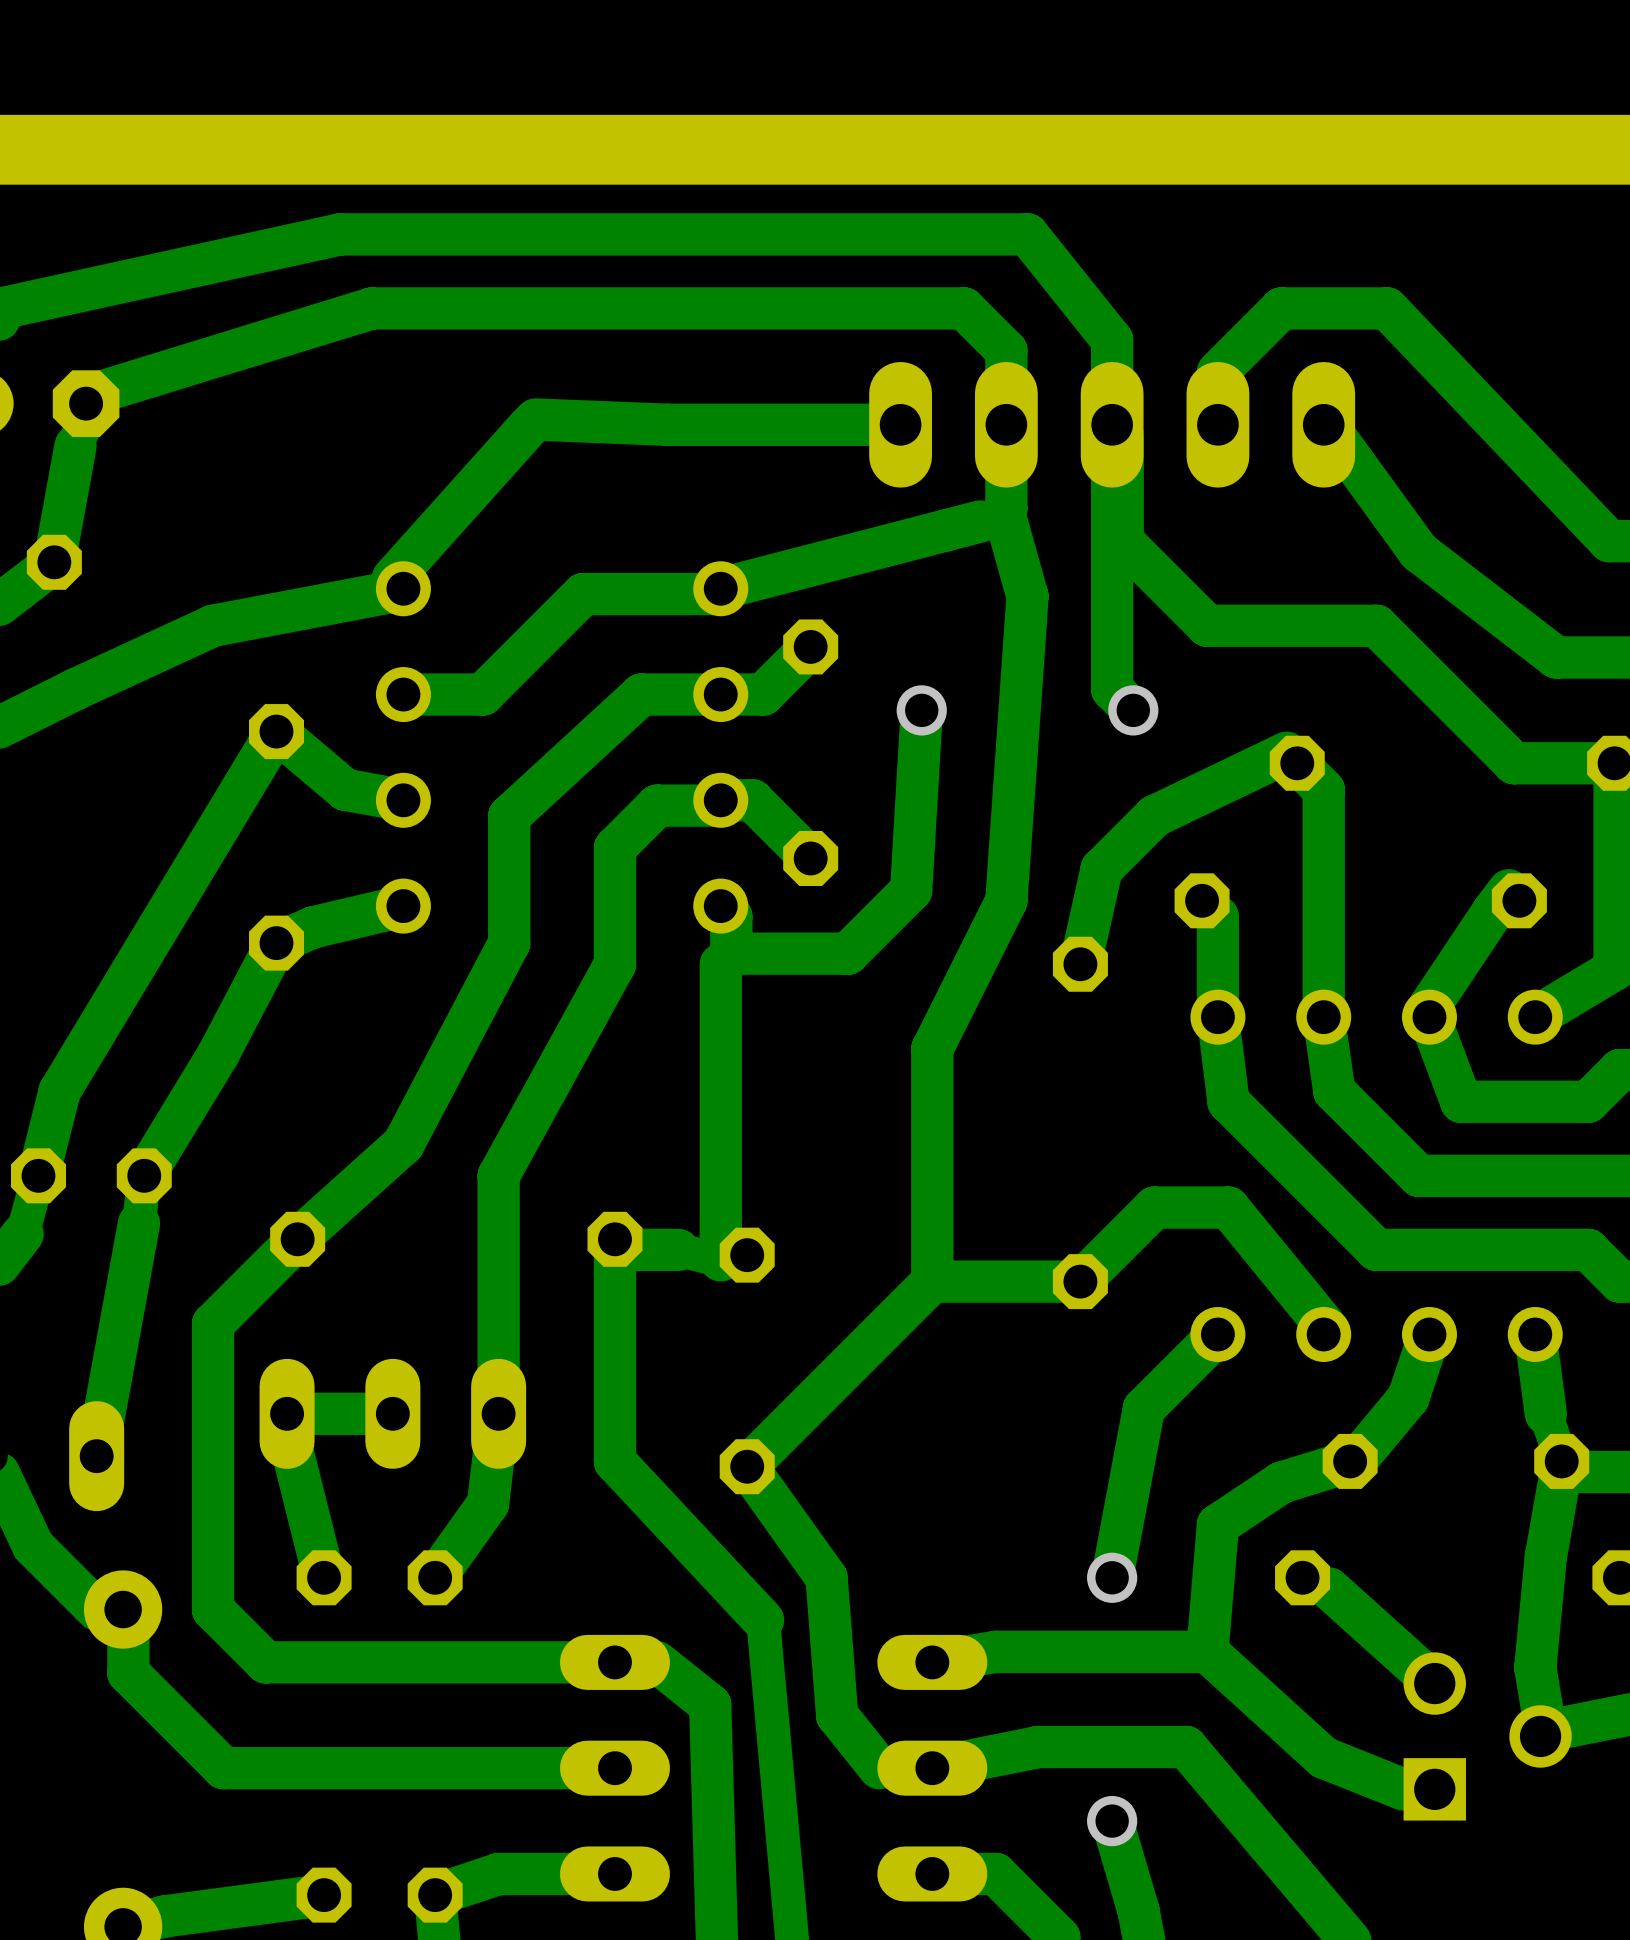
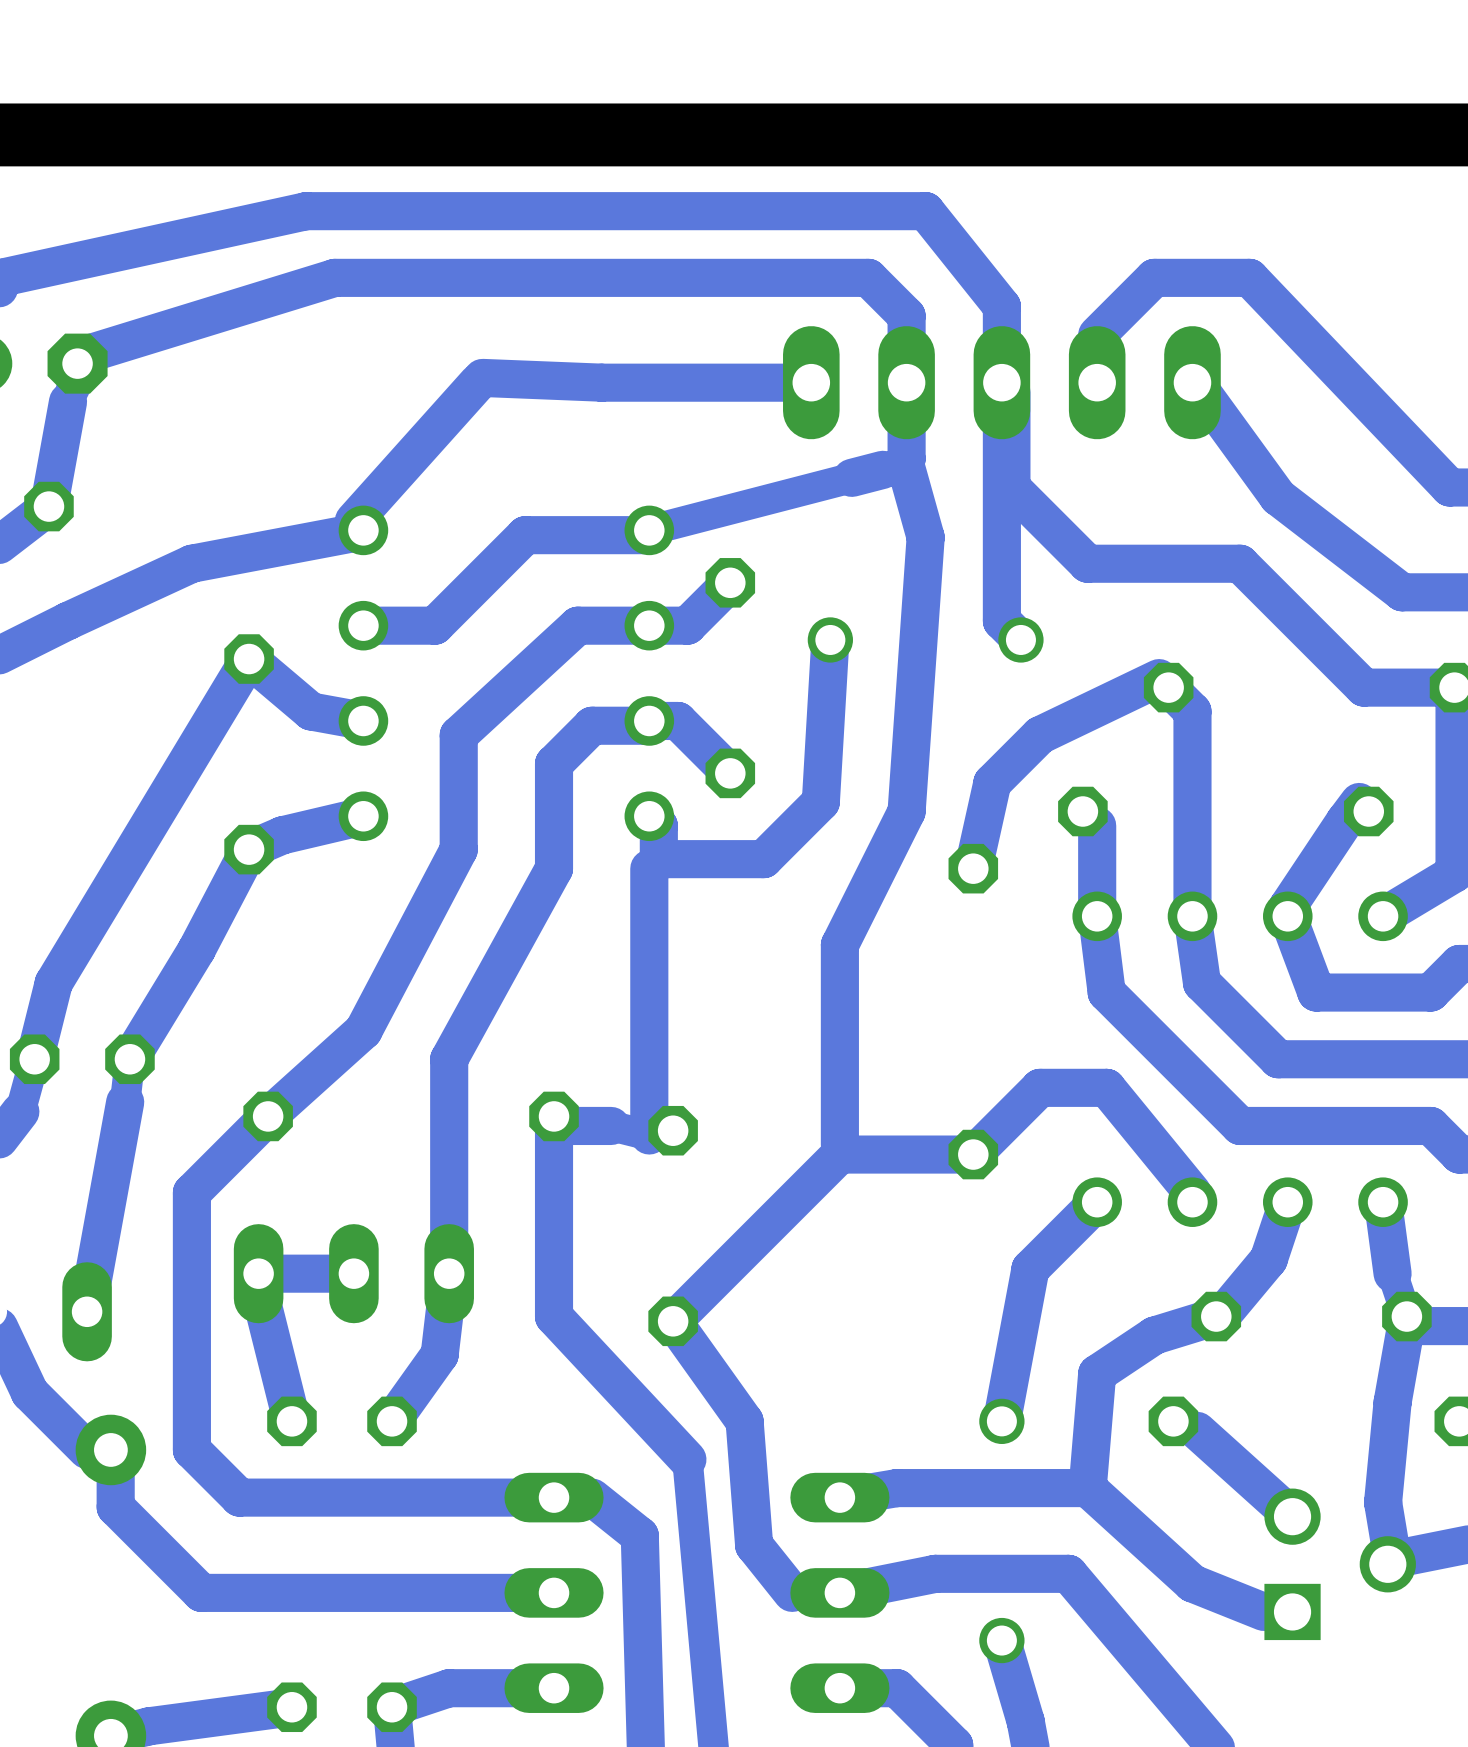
track width: thick (945, 530) (720, 588) -> thin (851, 477) (649, 530)

